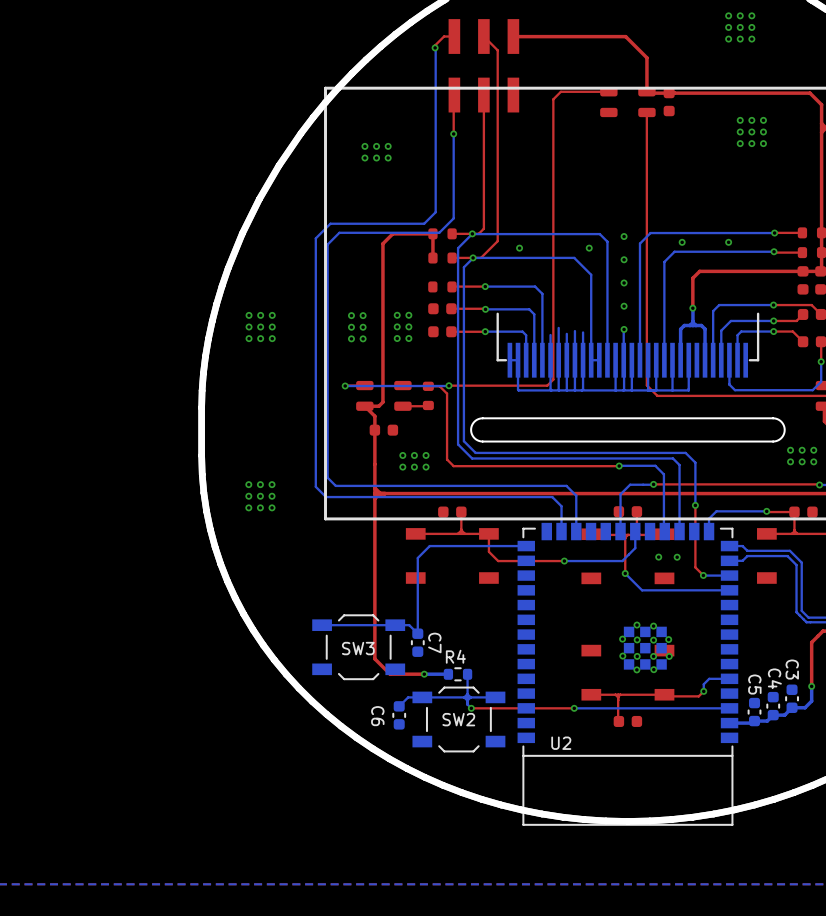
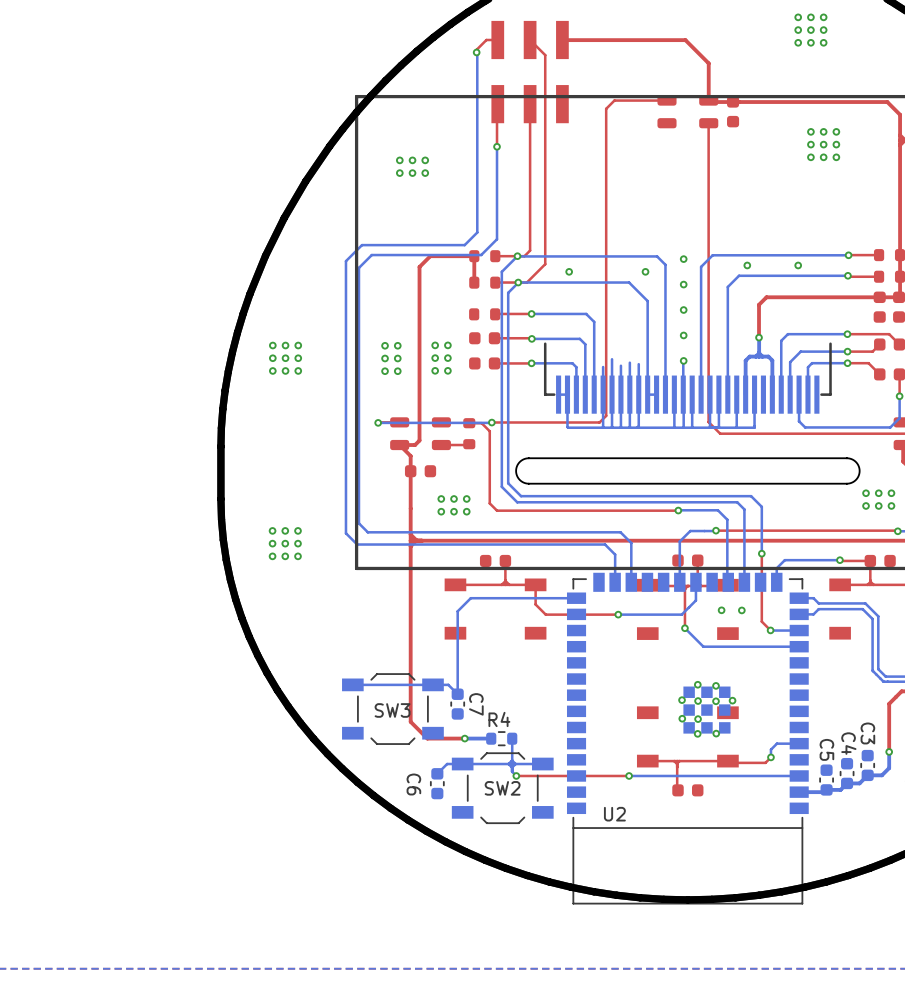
via: (653, 656) -> none
via: (669, 656) -> none

